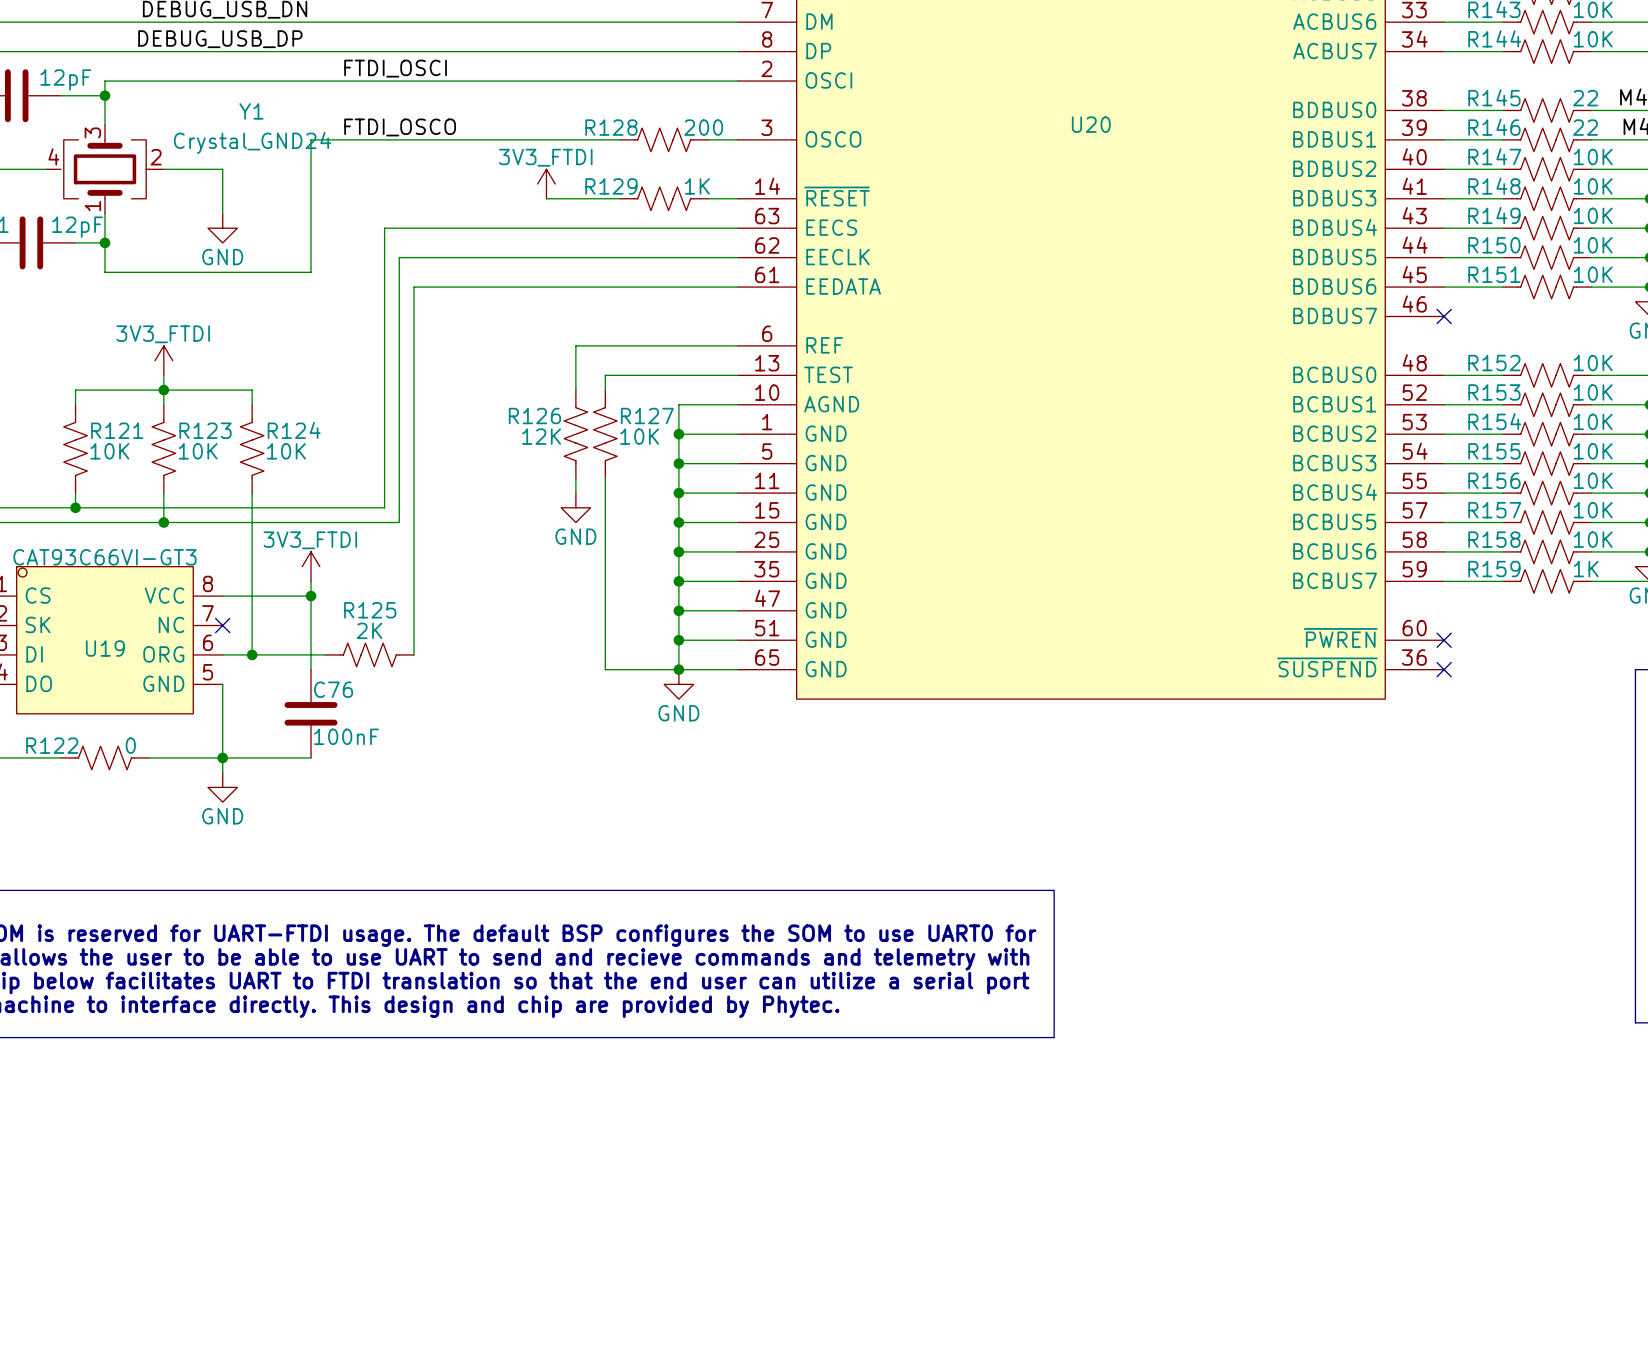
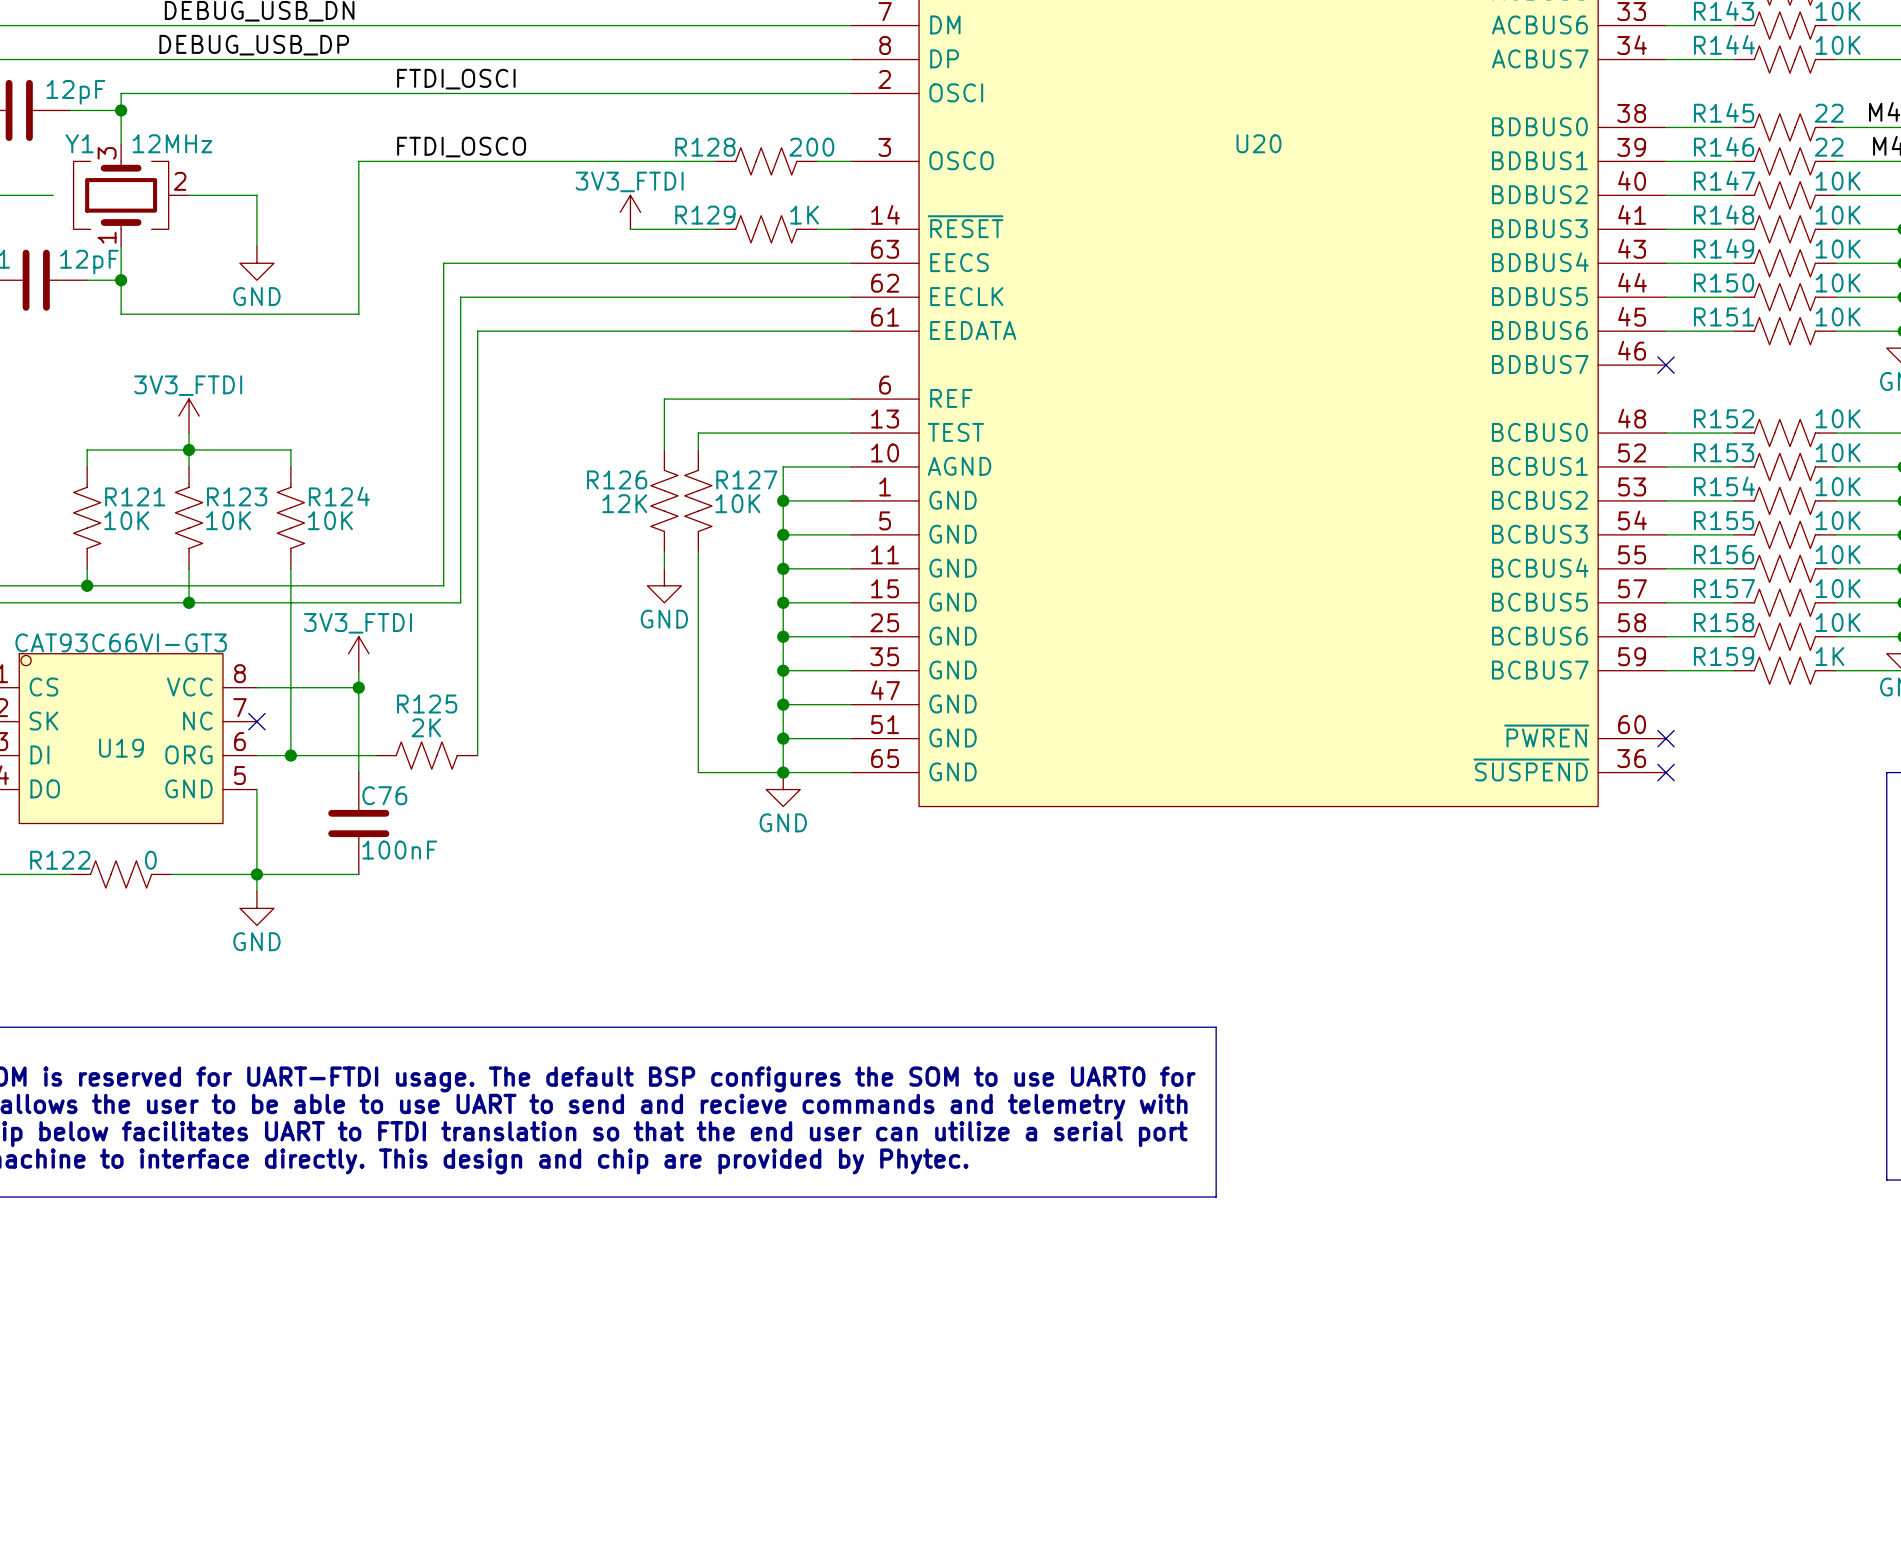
Y1 name position: Y1 (251, 111) -> Y1 (79, 143)
Y1 symbol: [46, 125, 164, 214] -> [73, 144, 190, 247]
Y1 value: Crystal_GND24 (252, 142) -> 12MHz (172, 143)

